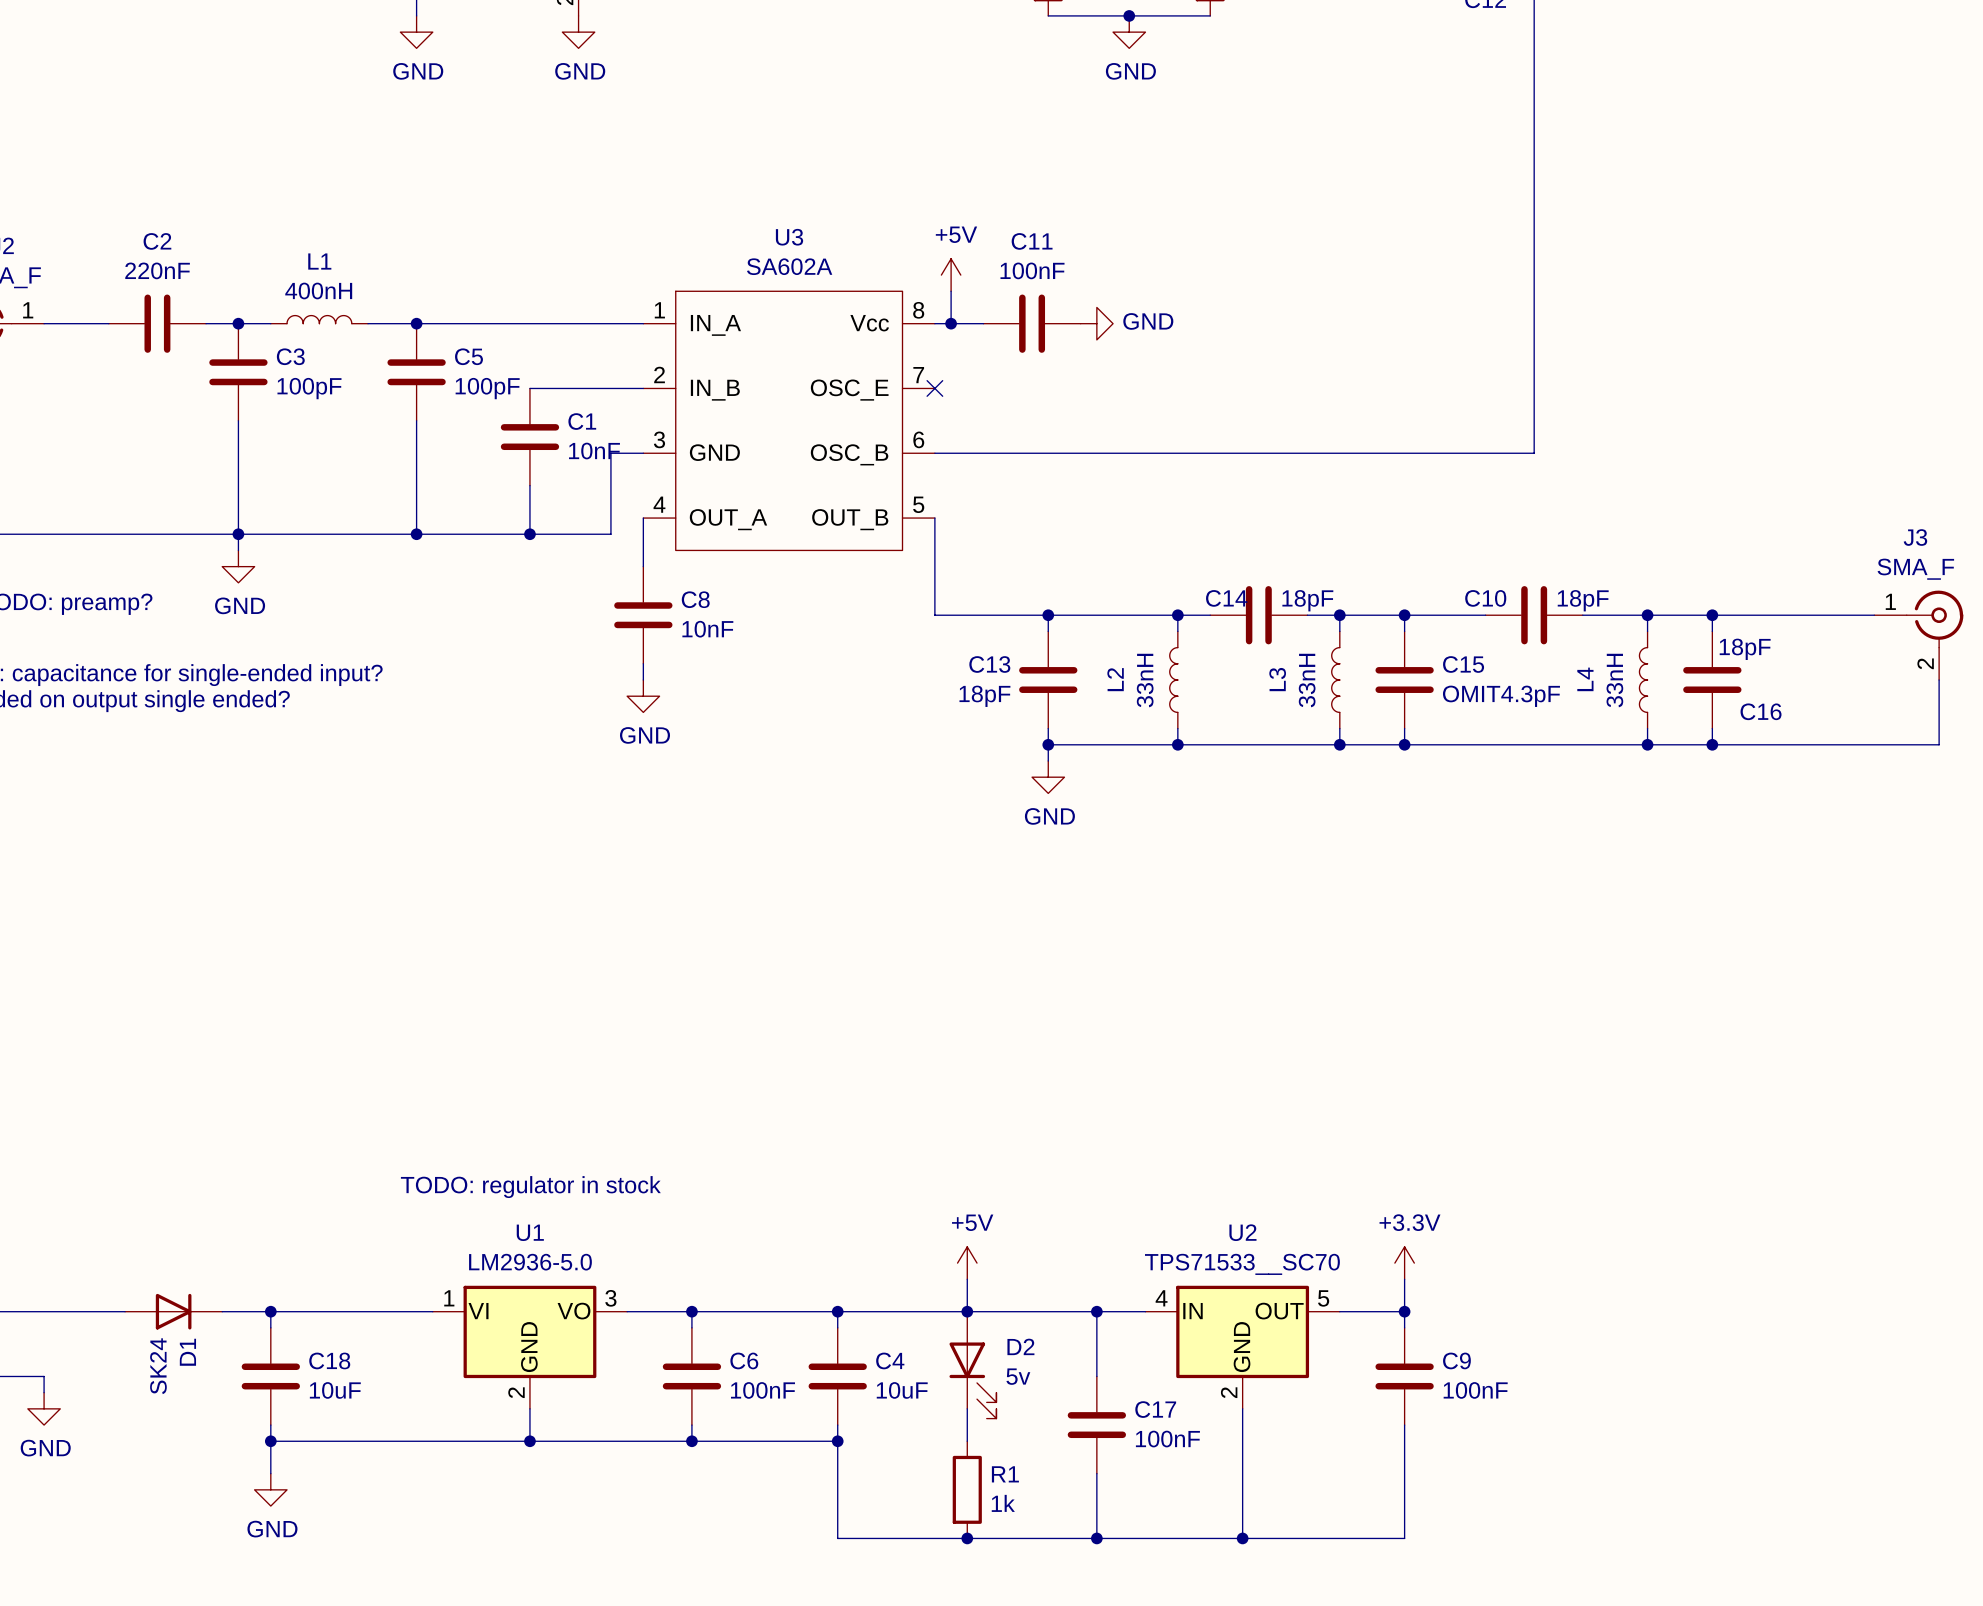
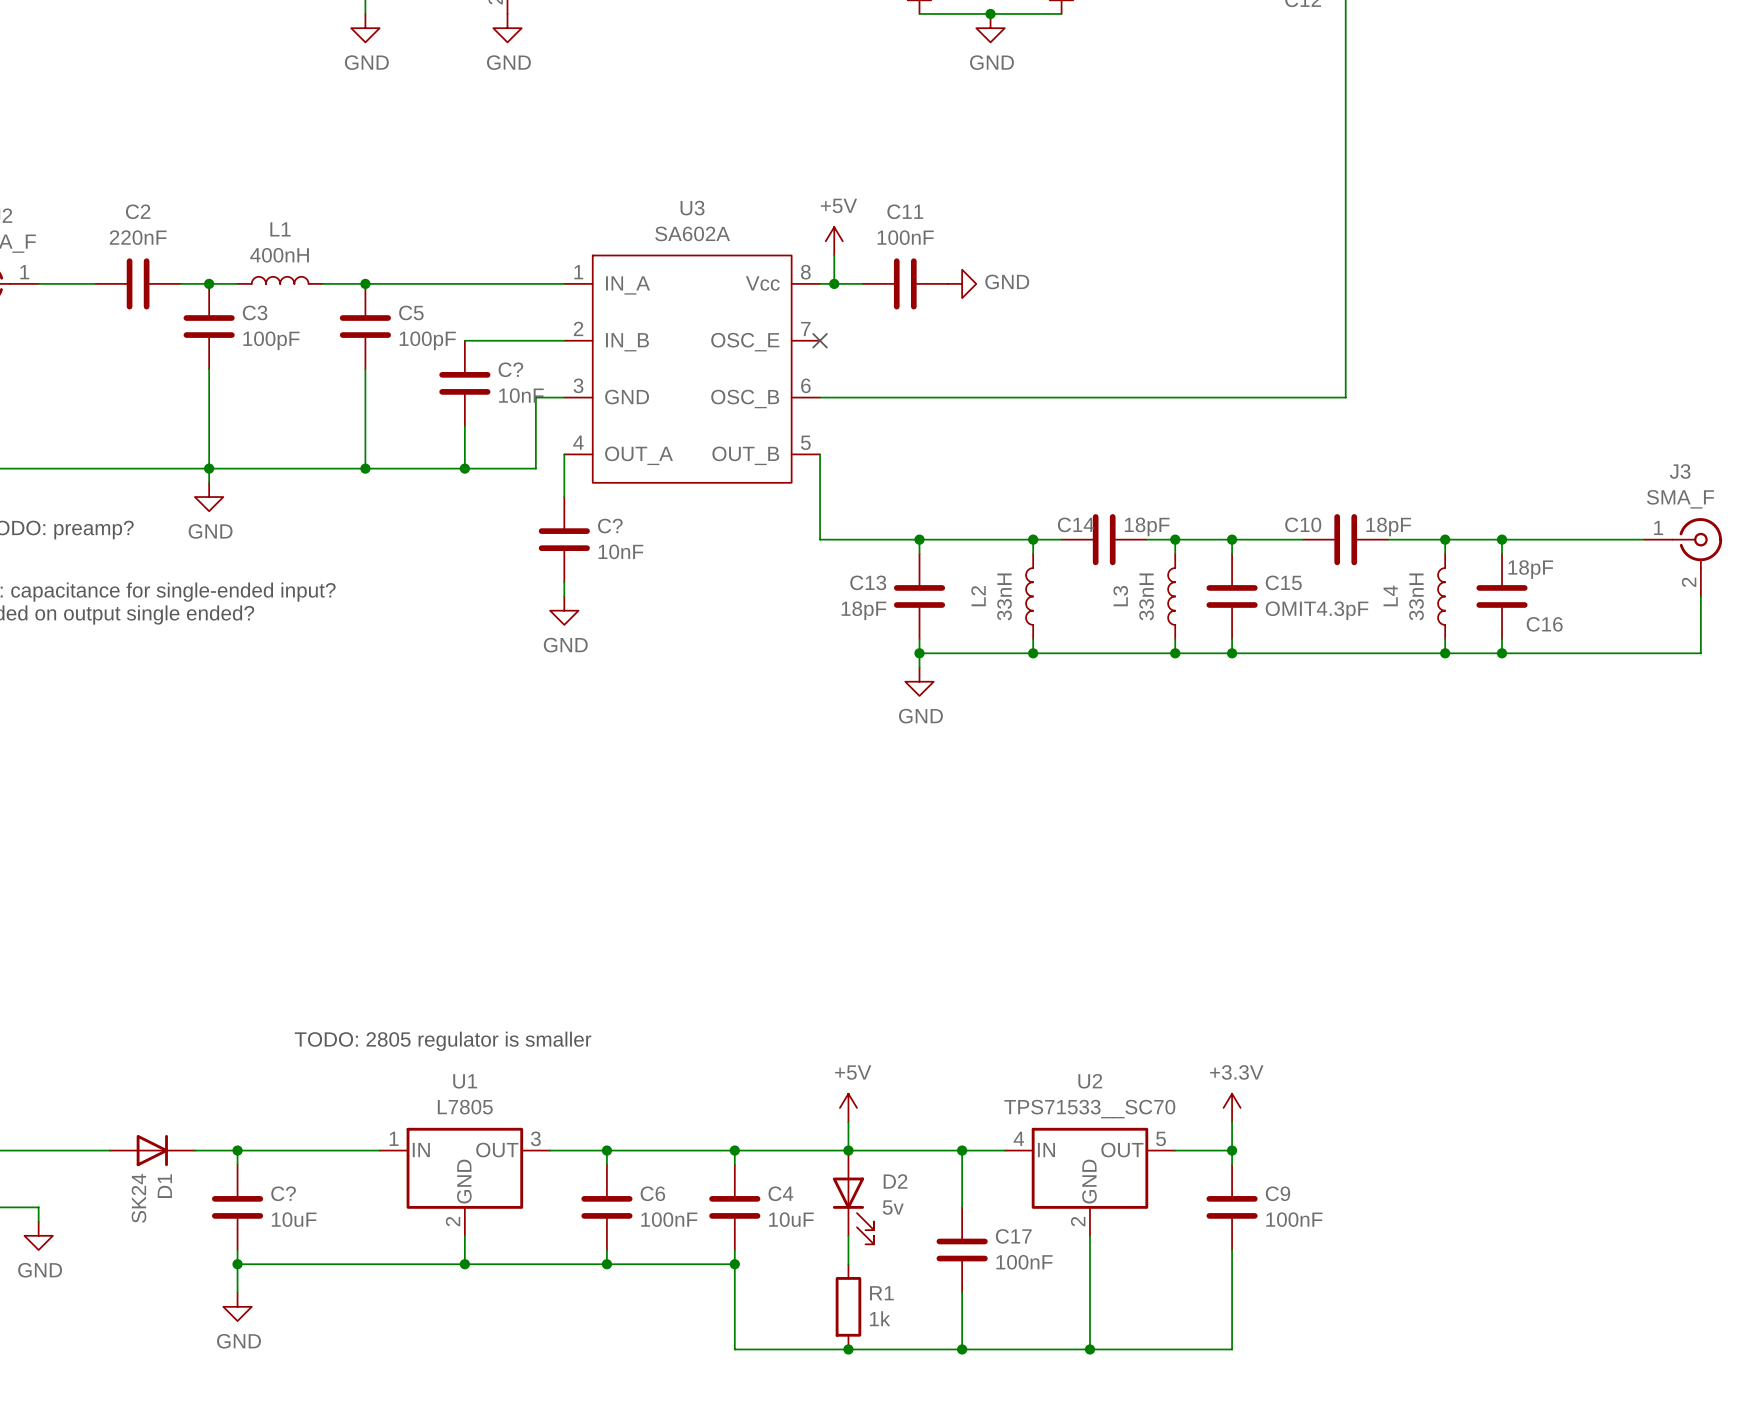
C1 name: C1 (582, 421) -> C? (510, 369)
C8 name: C8 (695, 599) -> C? (610, 526)
text: TODO: regulator in stock (530, 1187) -> TODO: 2805 regulator is smaller (443, 1041)
U1 value: LM2936-5.0 (530, 1262) -> L7805 (465, 1107)
U1 pin name: VI (478, 1311) -> IN (421, 1150)
U1 pin name: VO (574, 1311) -> OUT (497, 1150)
C18 name: C18 (329, 1360) -> C? (283, 1193)

